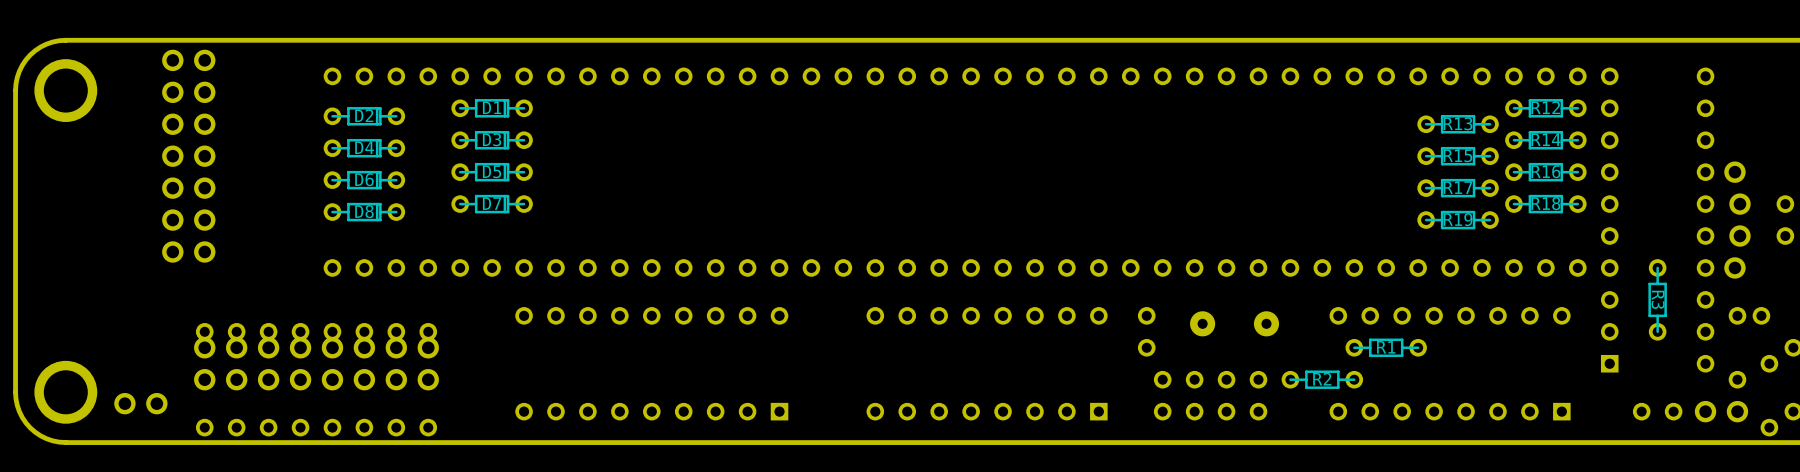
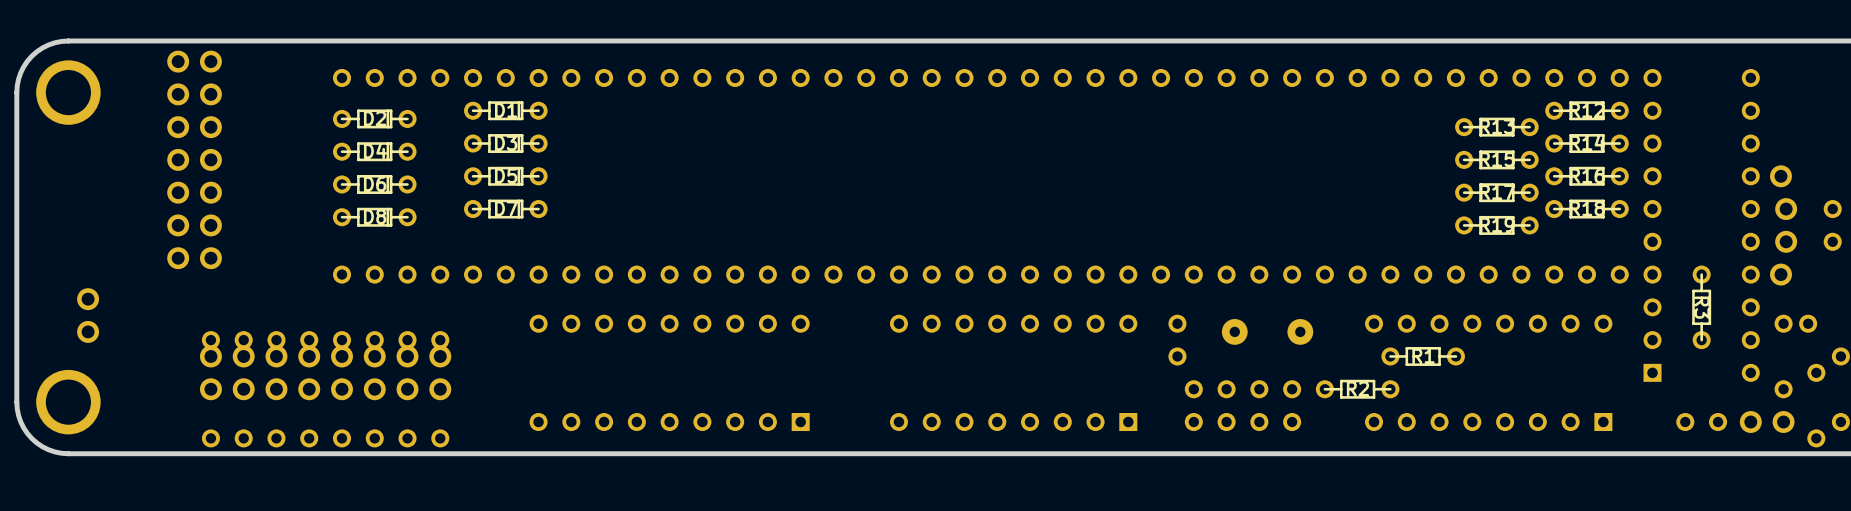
part rotation: 0° (140, 403) -> 90° clockwise (88, 315)
part position: (140, 403) -> (88, 315)

